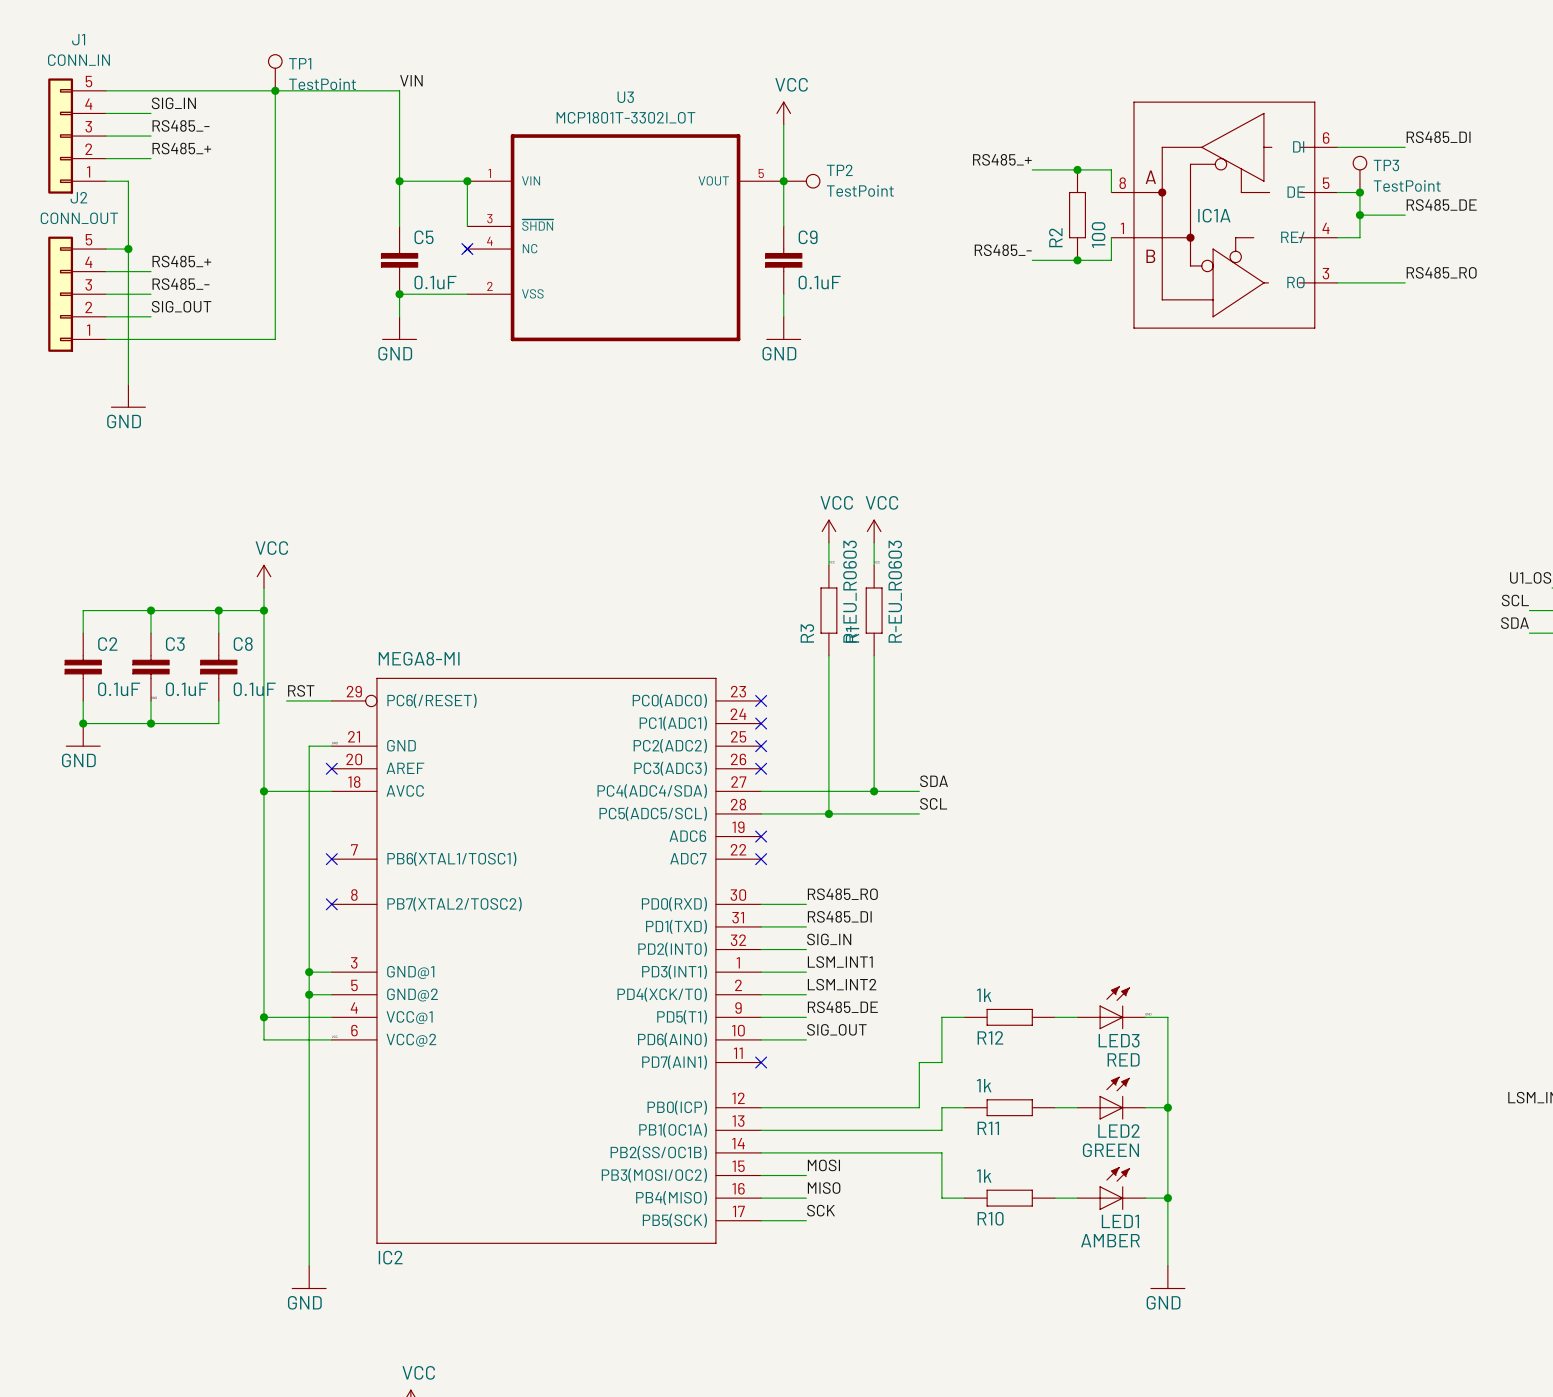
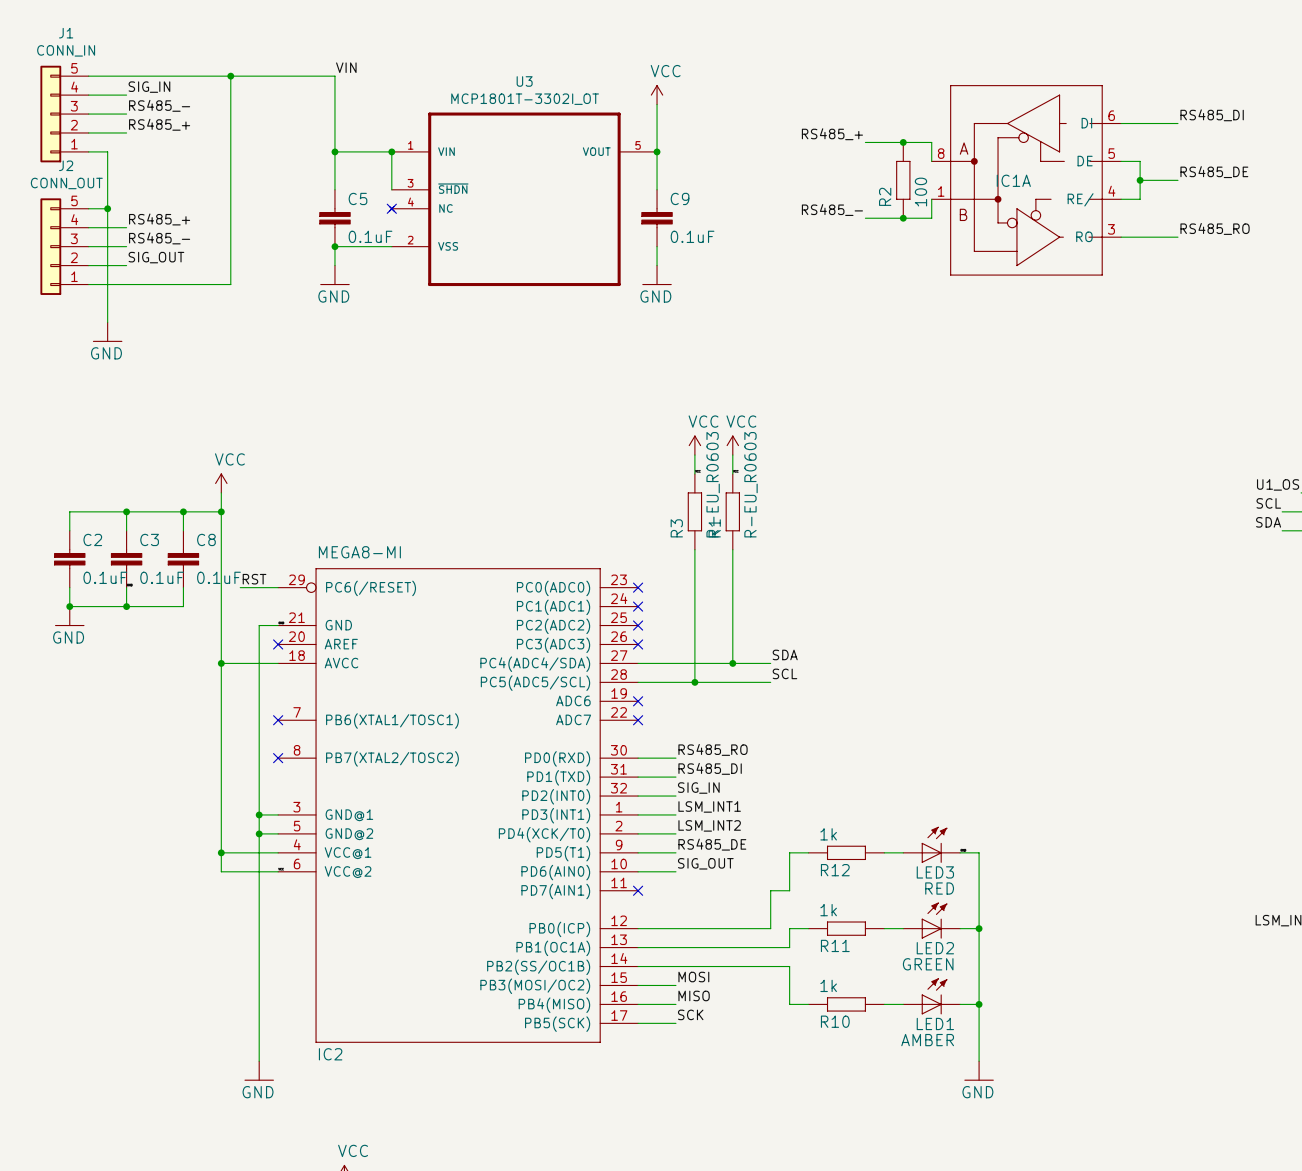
TP1: TestPoint (275, 72) -> none
TP3: TestPoint (1359, 174) -> none
TP2: TestPoint (801, 181) -> none
junction: (1359, 192) -> none

